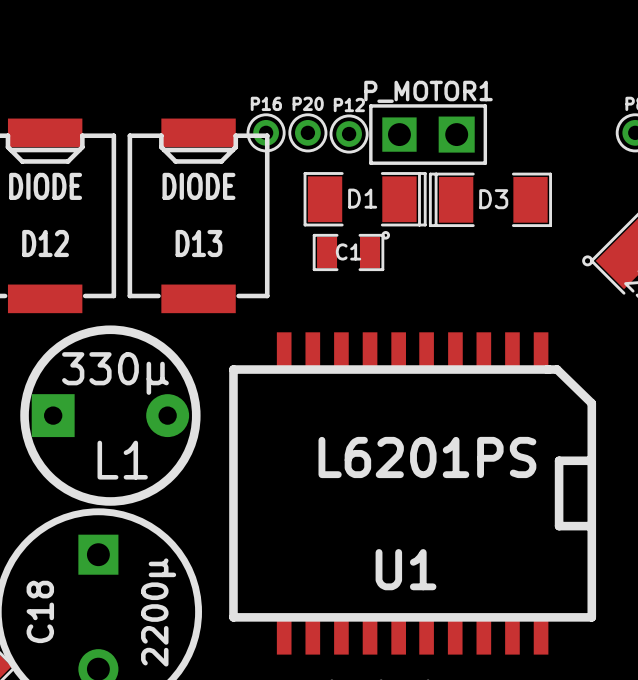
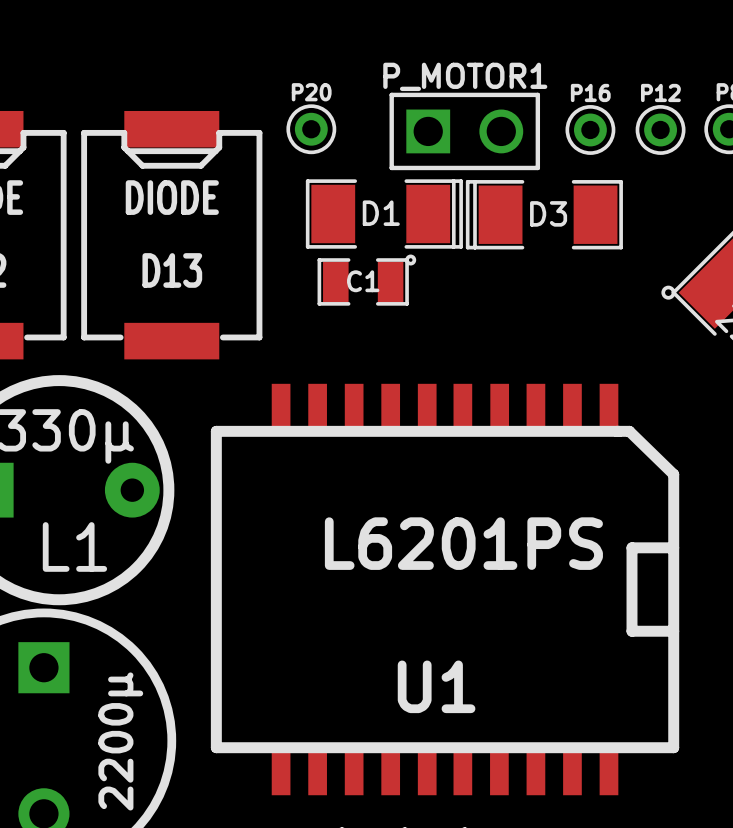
P_MOTOR1 footprint: [369, 104, 488, 165] -> [389, 92, 541, 171]
P16 position: (266, 132) -> (590, 129)
P12 position: (349, 134) -> (660, 129)

